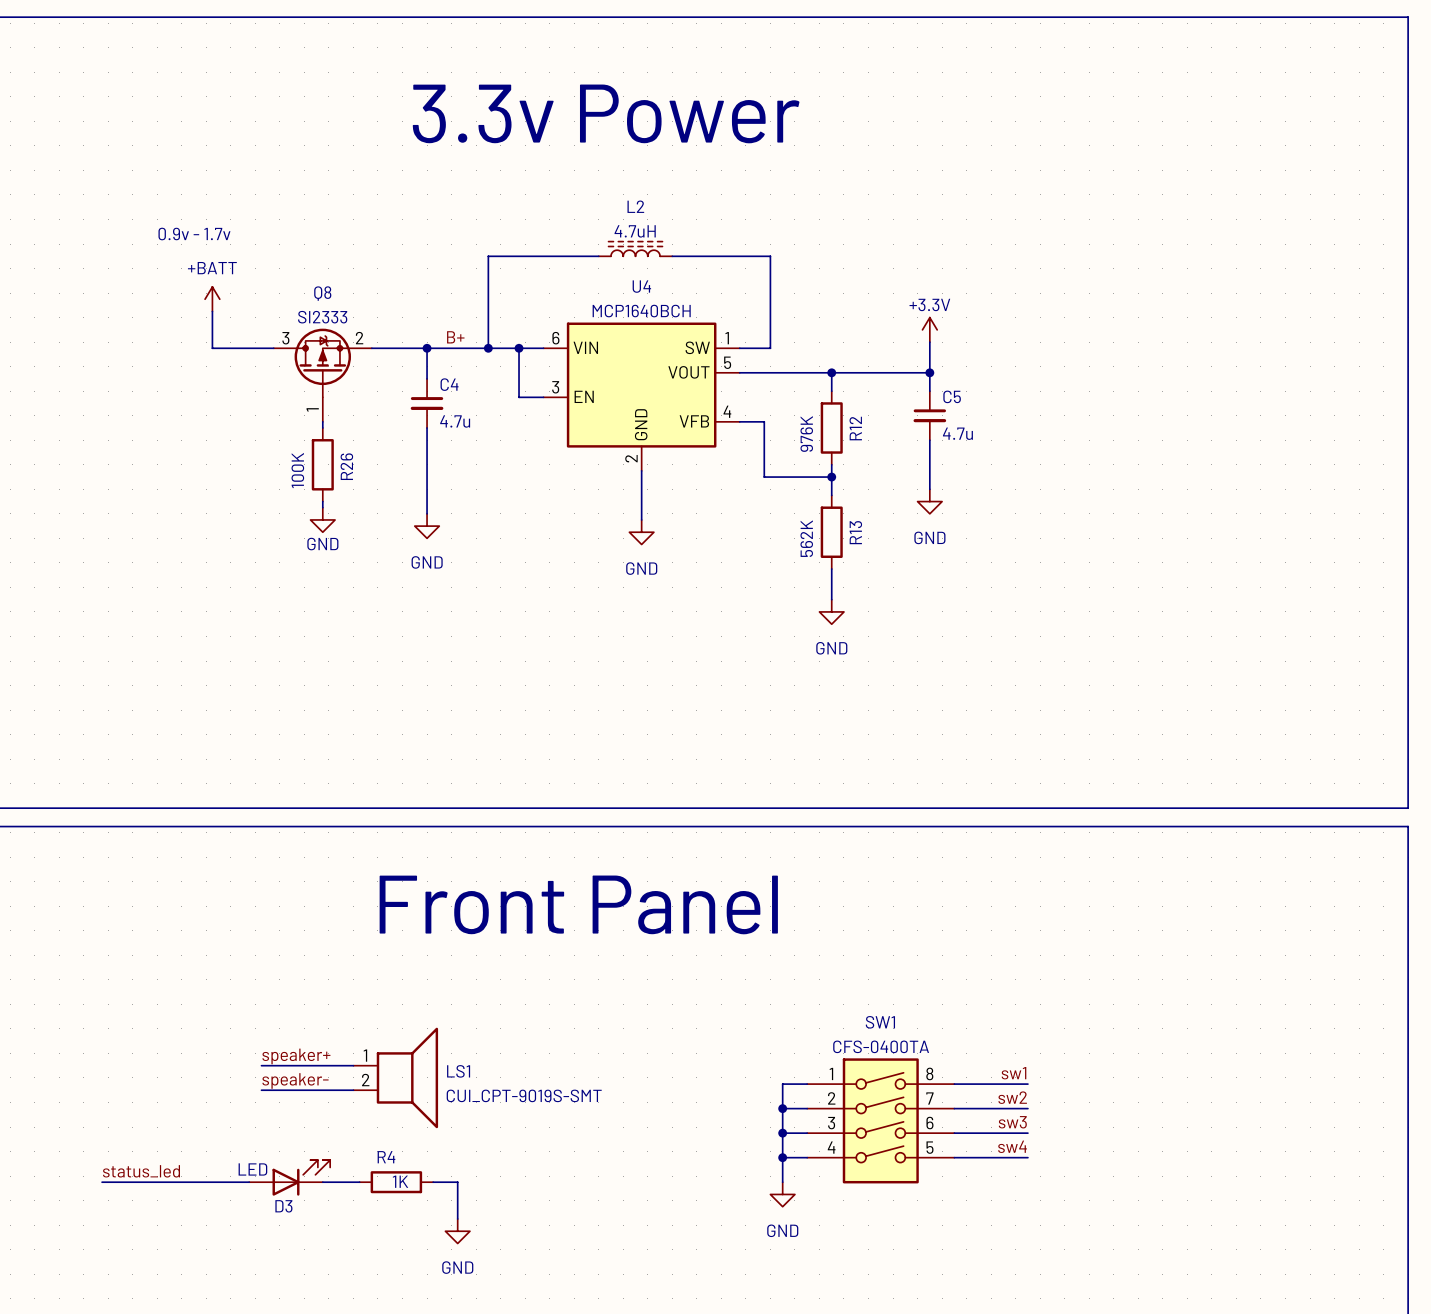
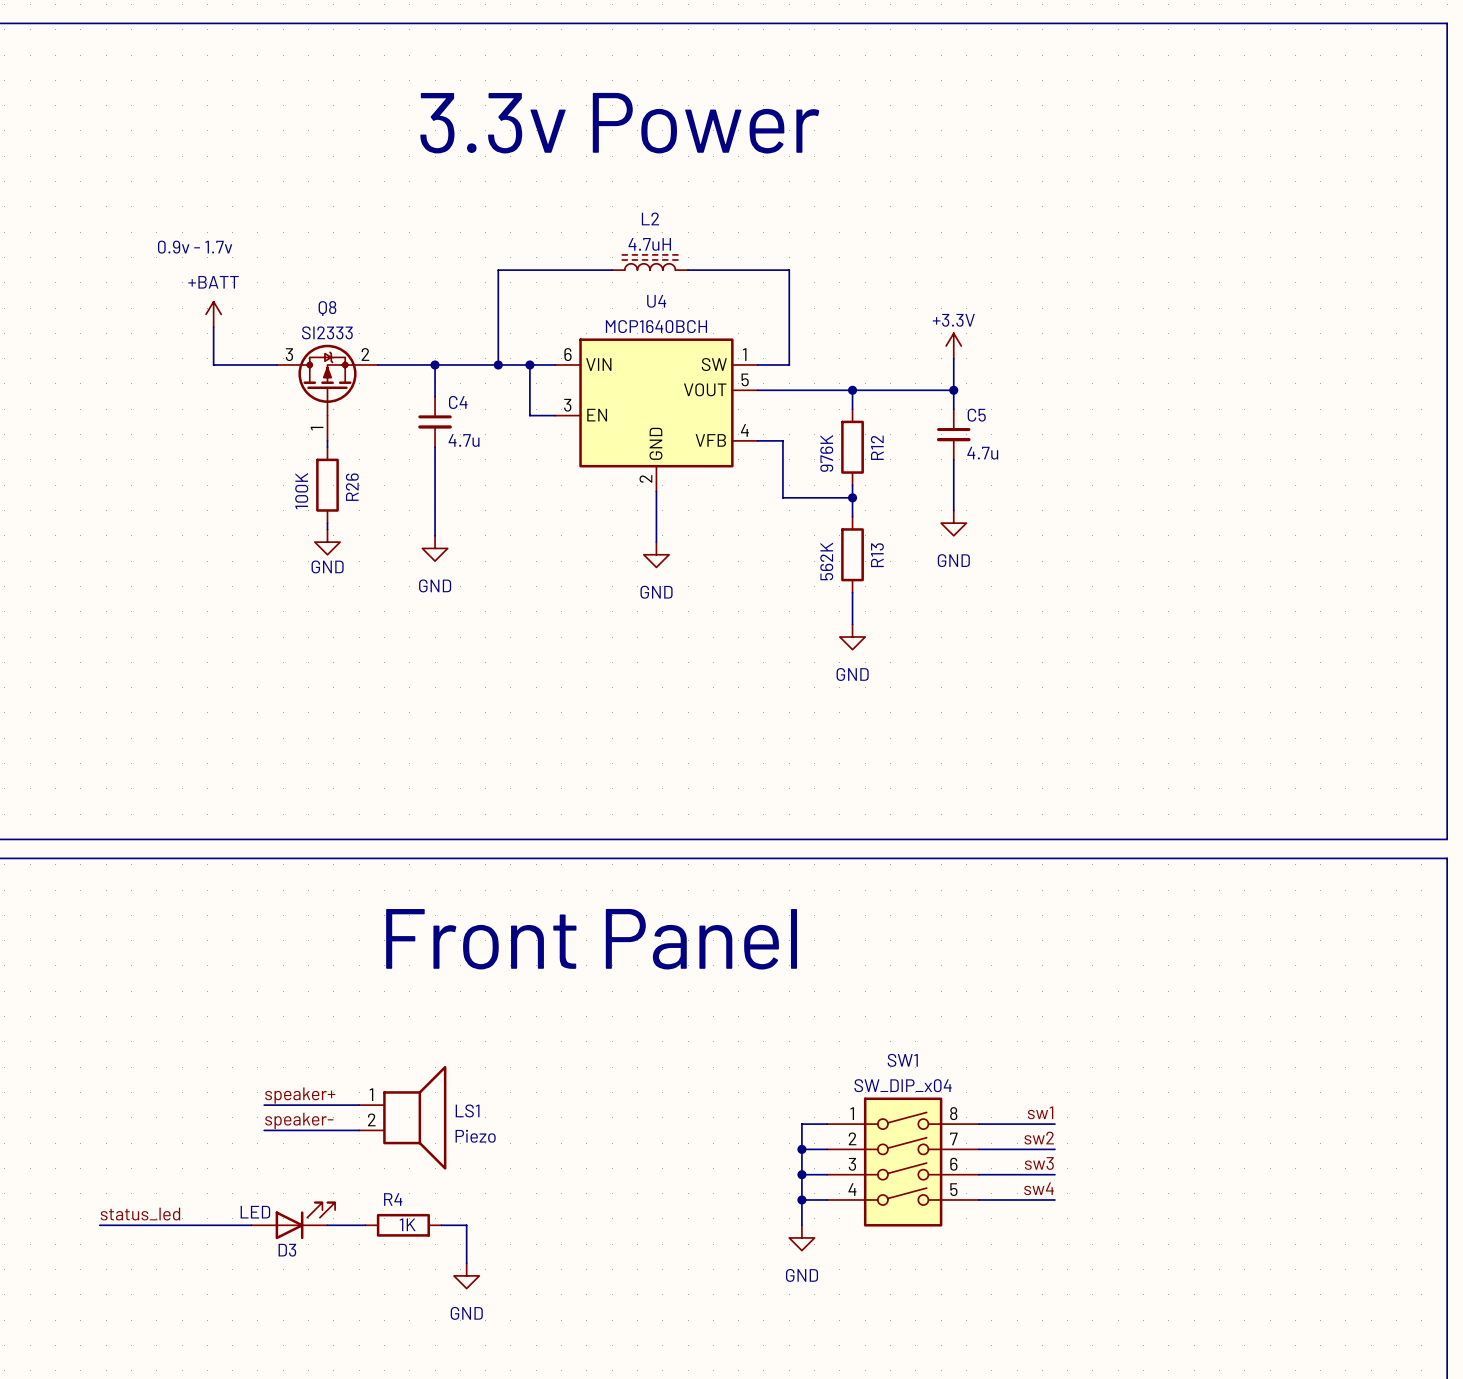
label: B+ (455, 337) -> none
SW1 value: CFS-0400TA (881, 1046) -> SW_DIP_x04 (903, 1085)
LS1 value: CUI_CPT-9019S-SMT (524, 1095) -> Piezo (475, 1136)

